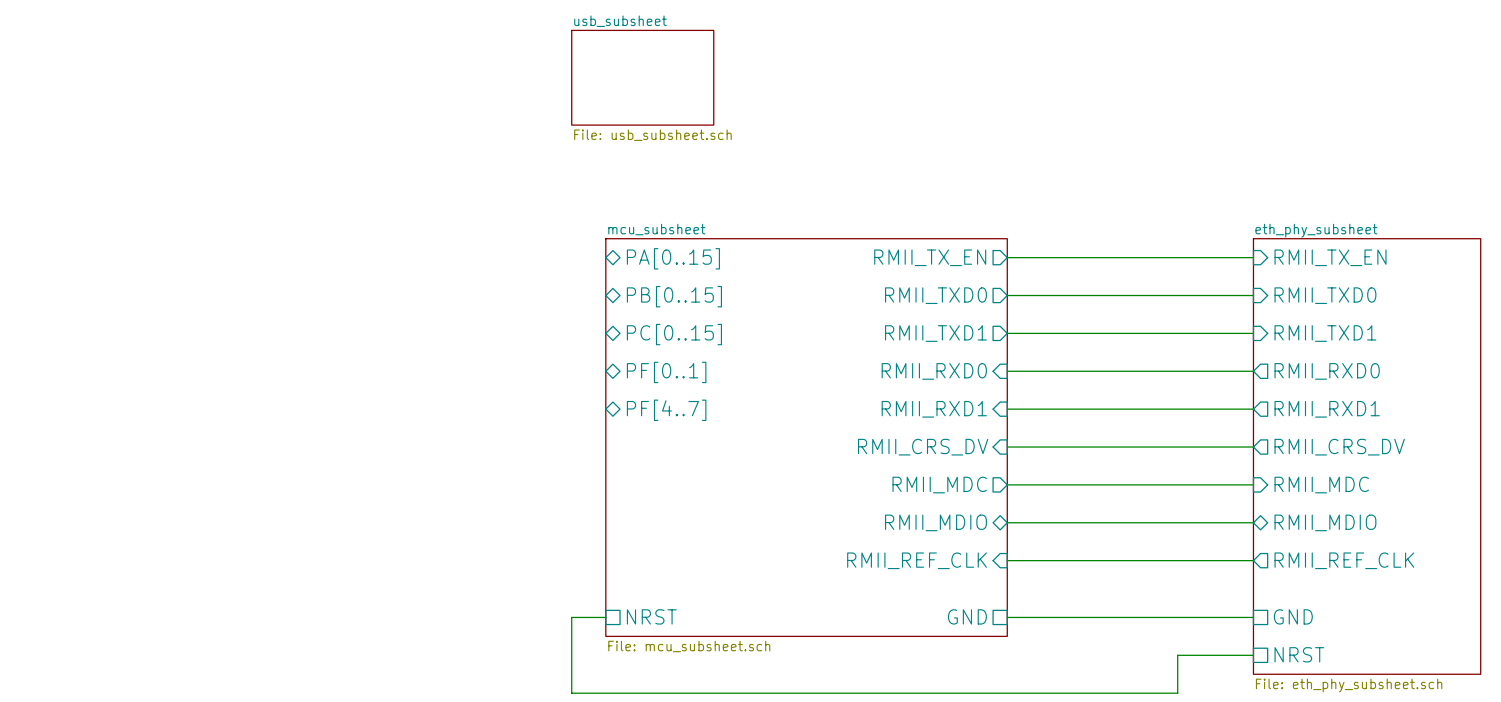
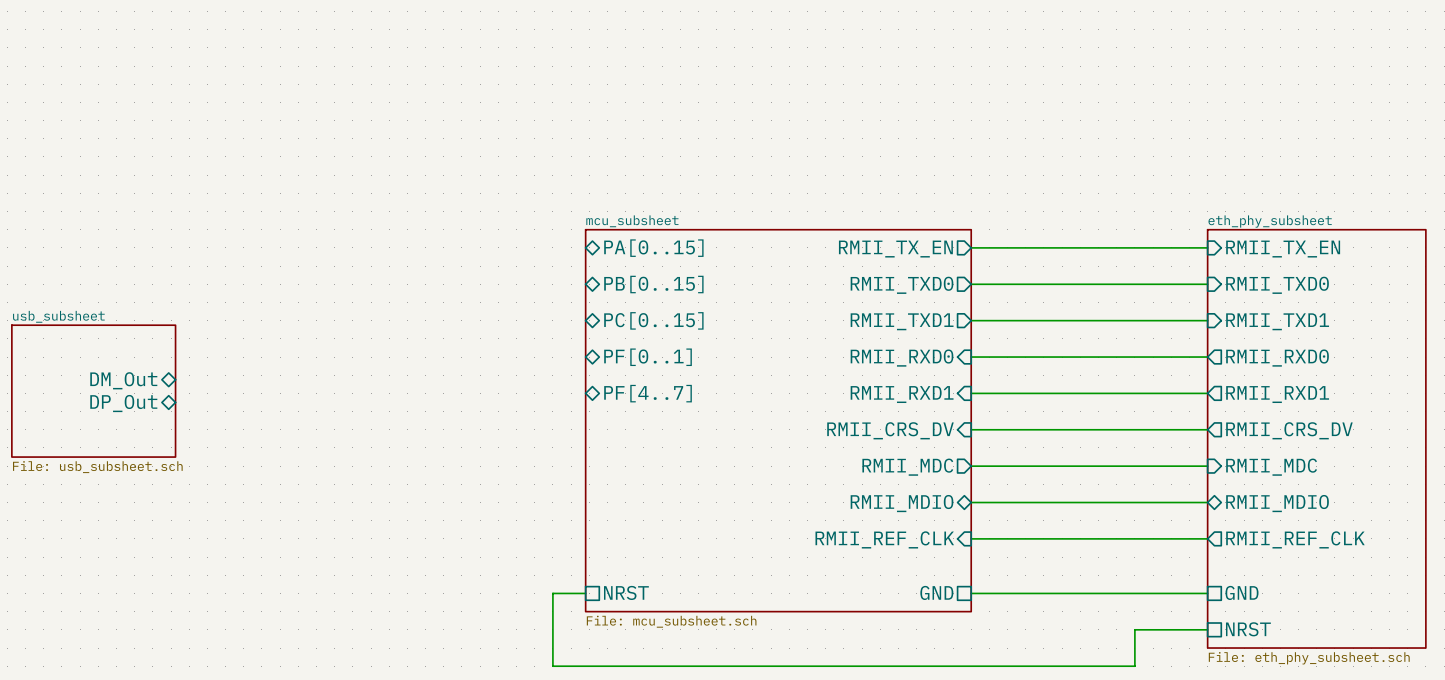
sheet usb_subsheet: File: usb_subsheet.sch (642, 77) -> none
sheet pin: none -> DM_Out (123, 380)
sheet usb_subsheet: none -> File: usb_subsheet.sch (93, 391)
sheet pin: none -> DP_Out (123, 403)

